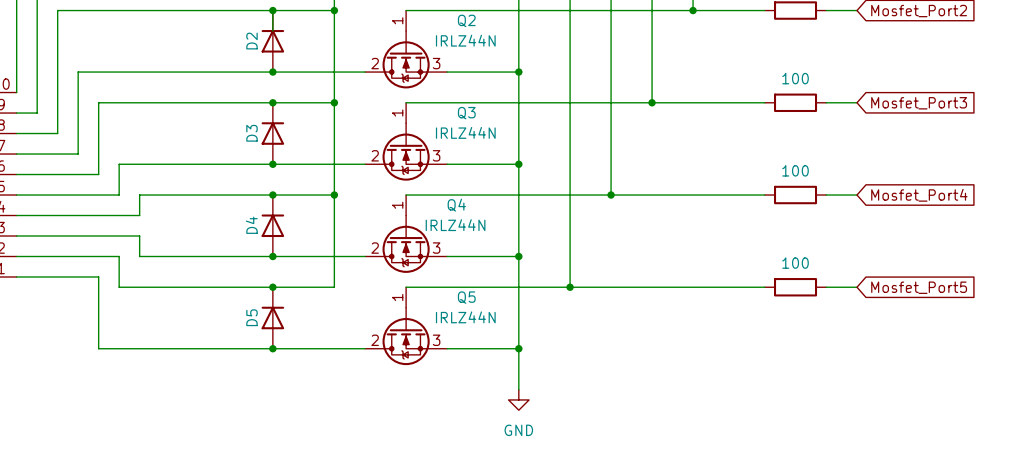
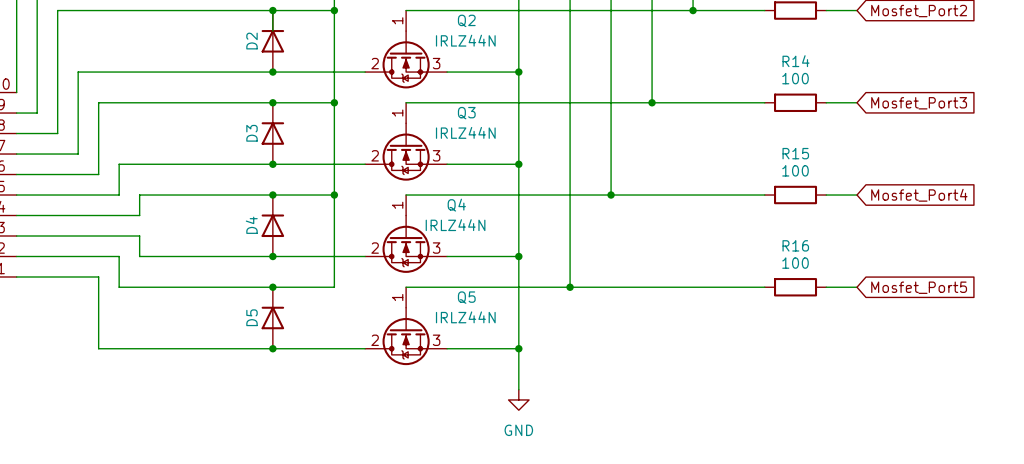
R14 name: none -> R14 (796, 61)
R15 name: none -> R15 (795, 153)
R16 name: none -> R16 (795, 245)

